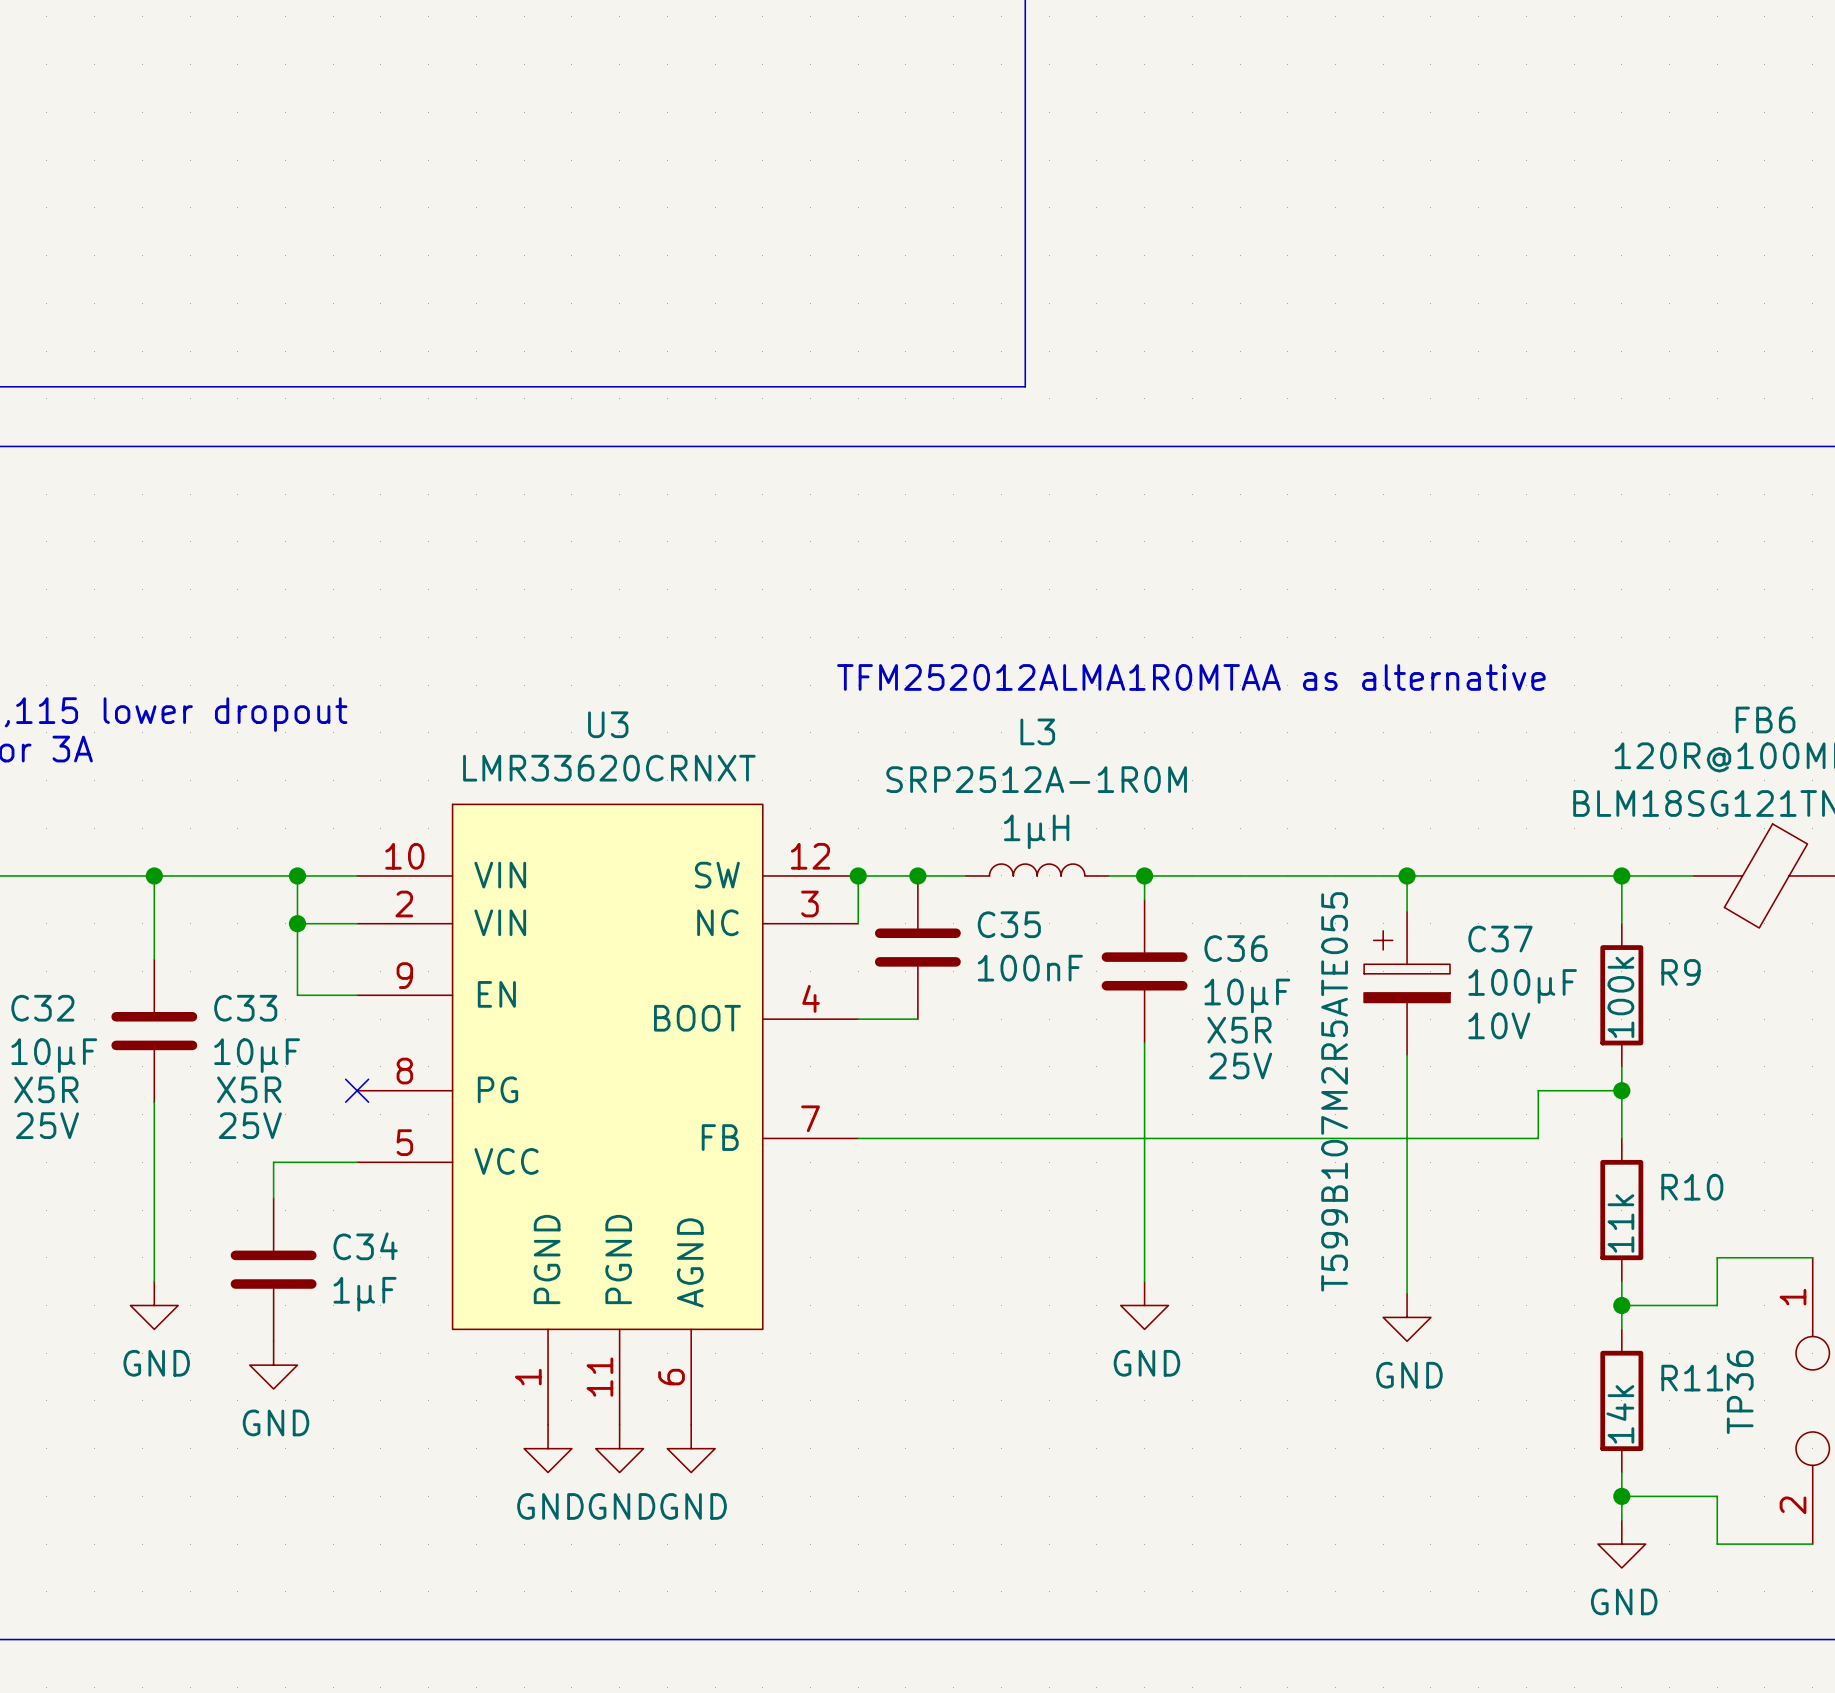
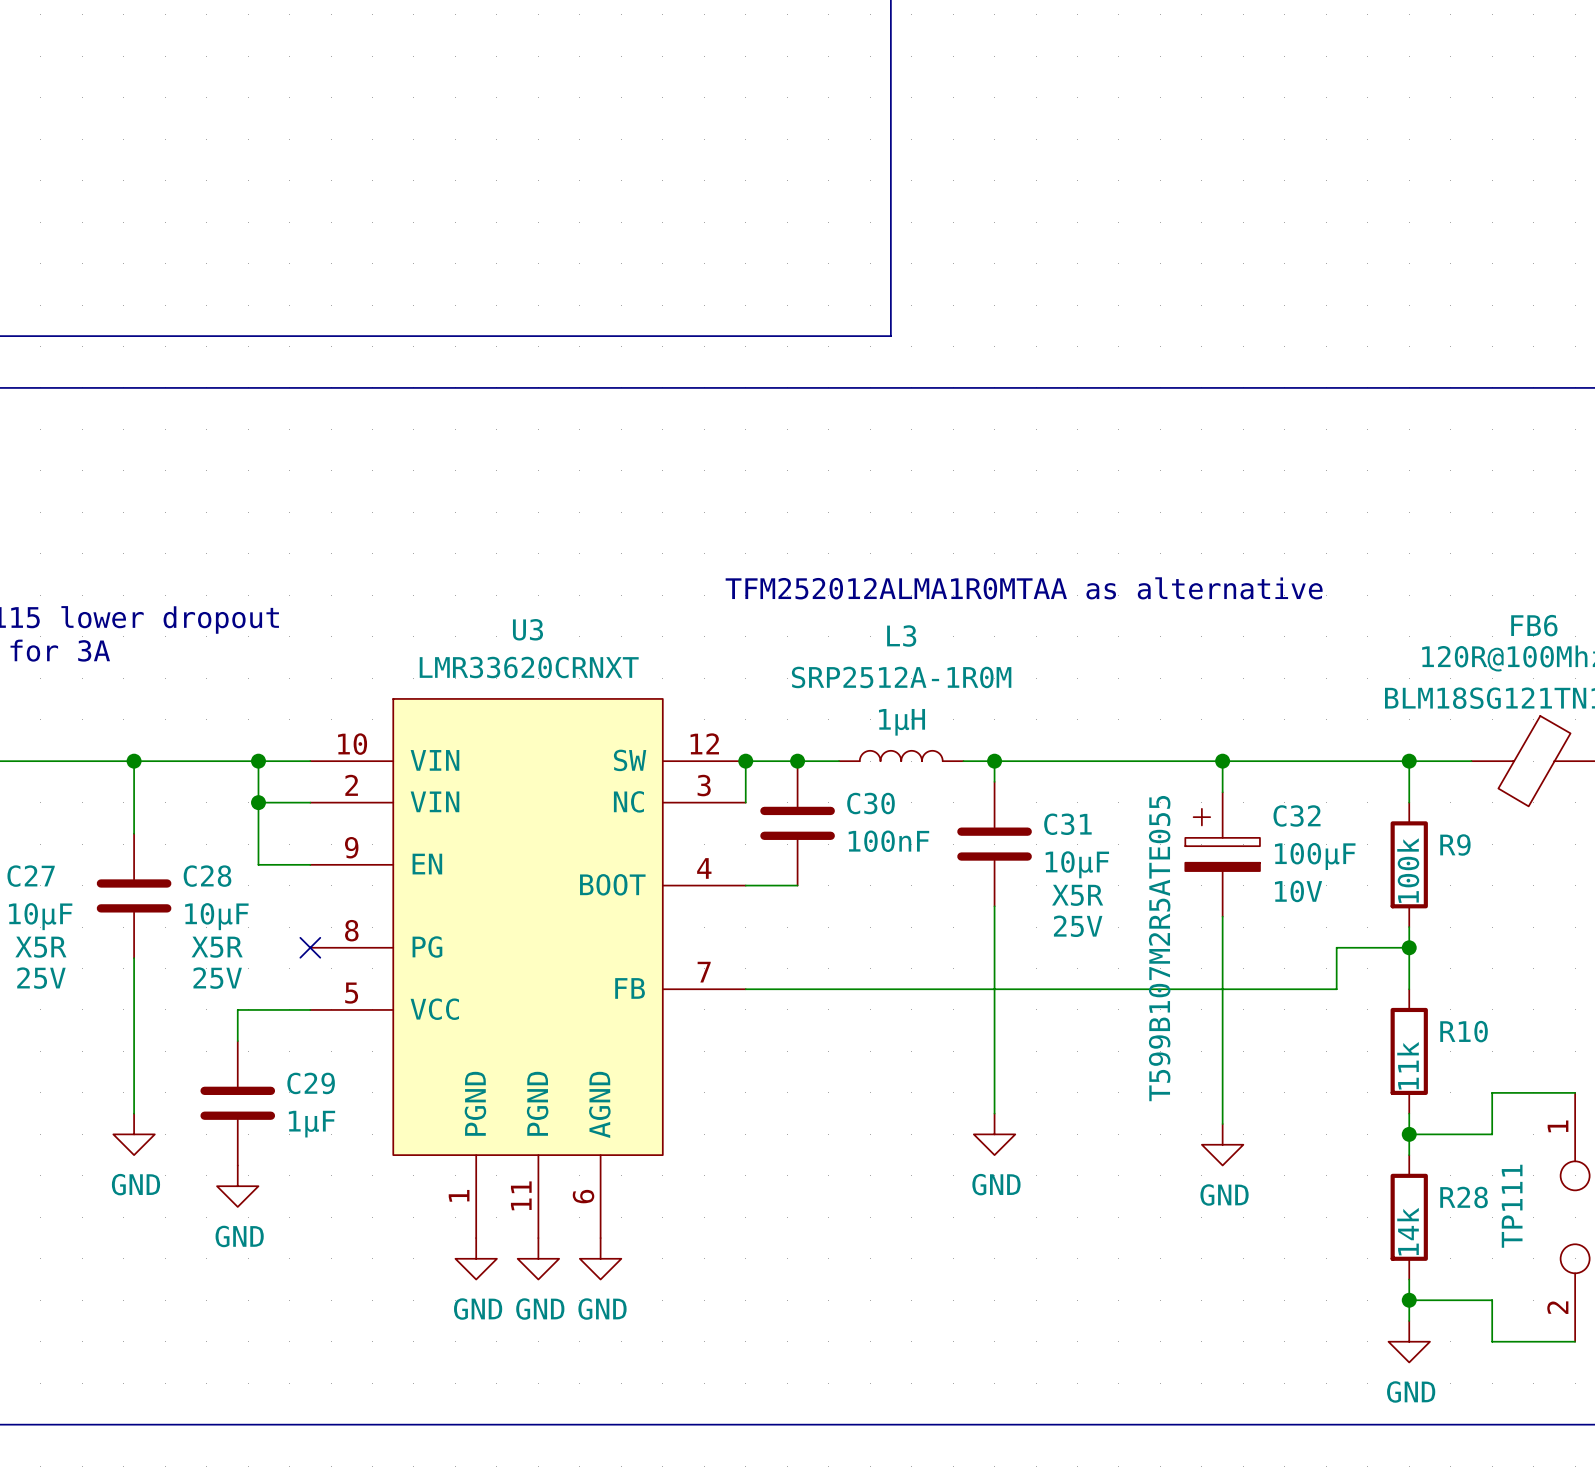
C35 name: C35 (1009, 924) -> C30 (870, 803)
C37 name: C37 (1500, 939) -> C32 (1297, 815)
C36 name: C36 (1236, 948) -> C31 (1067, 824)
C32 name: C32 (42, 1008) -> C27 (31, 876)
C33 name: C33 (245, 1008) -> C28 (207, 876)
C34 name: C34 (365, 1246) -> C29 (311, 1083)
R11 name: R11 (1692, 1378) -> R28 (1464, 1197)
TP36 name: TP36 (1740, 1392) -> TP111 (1512, 1206)

